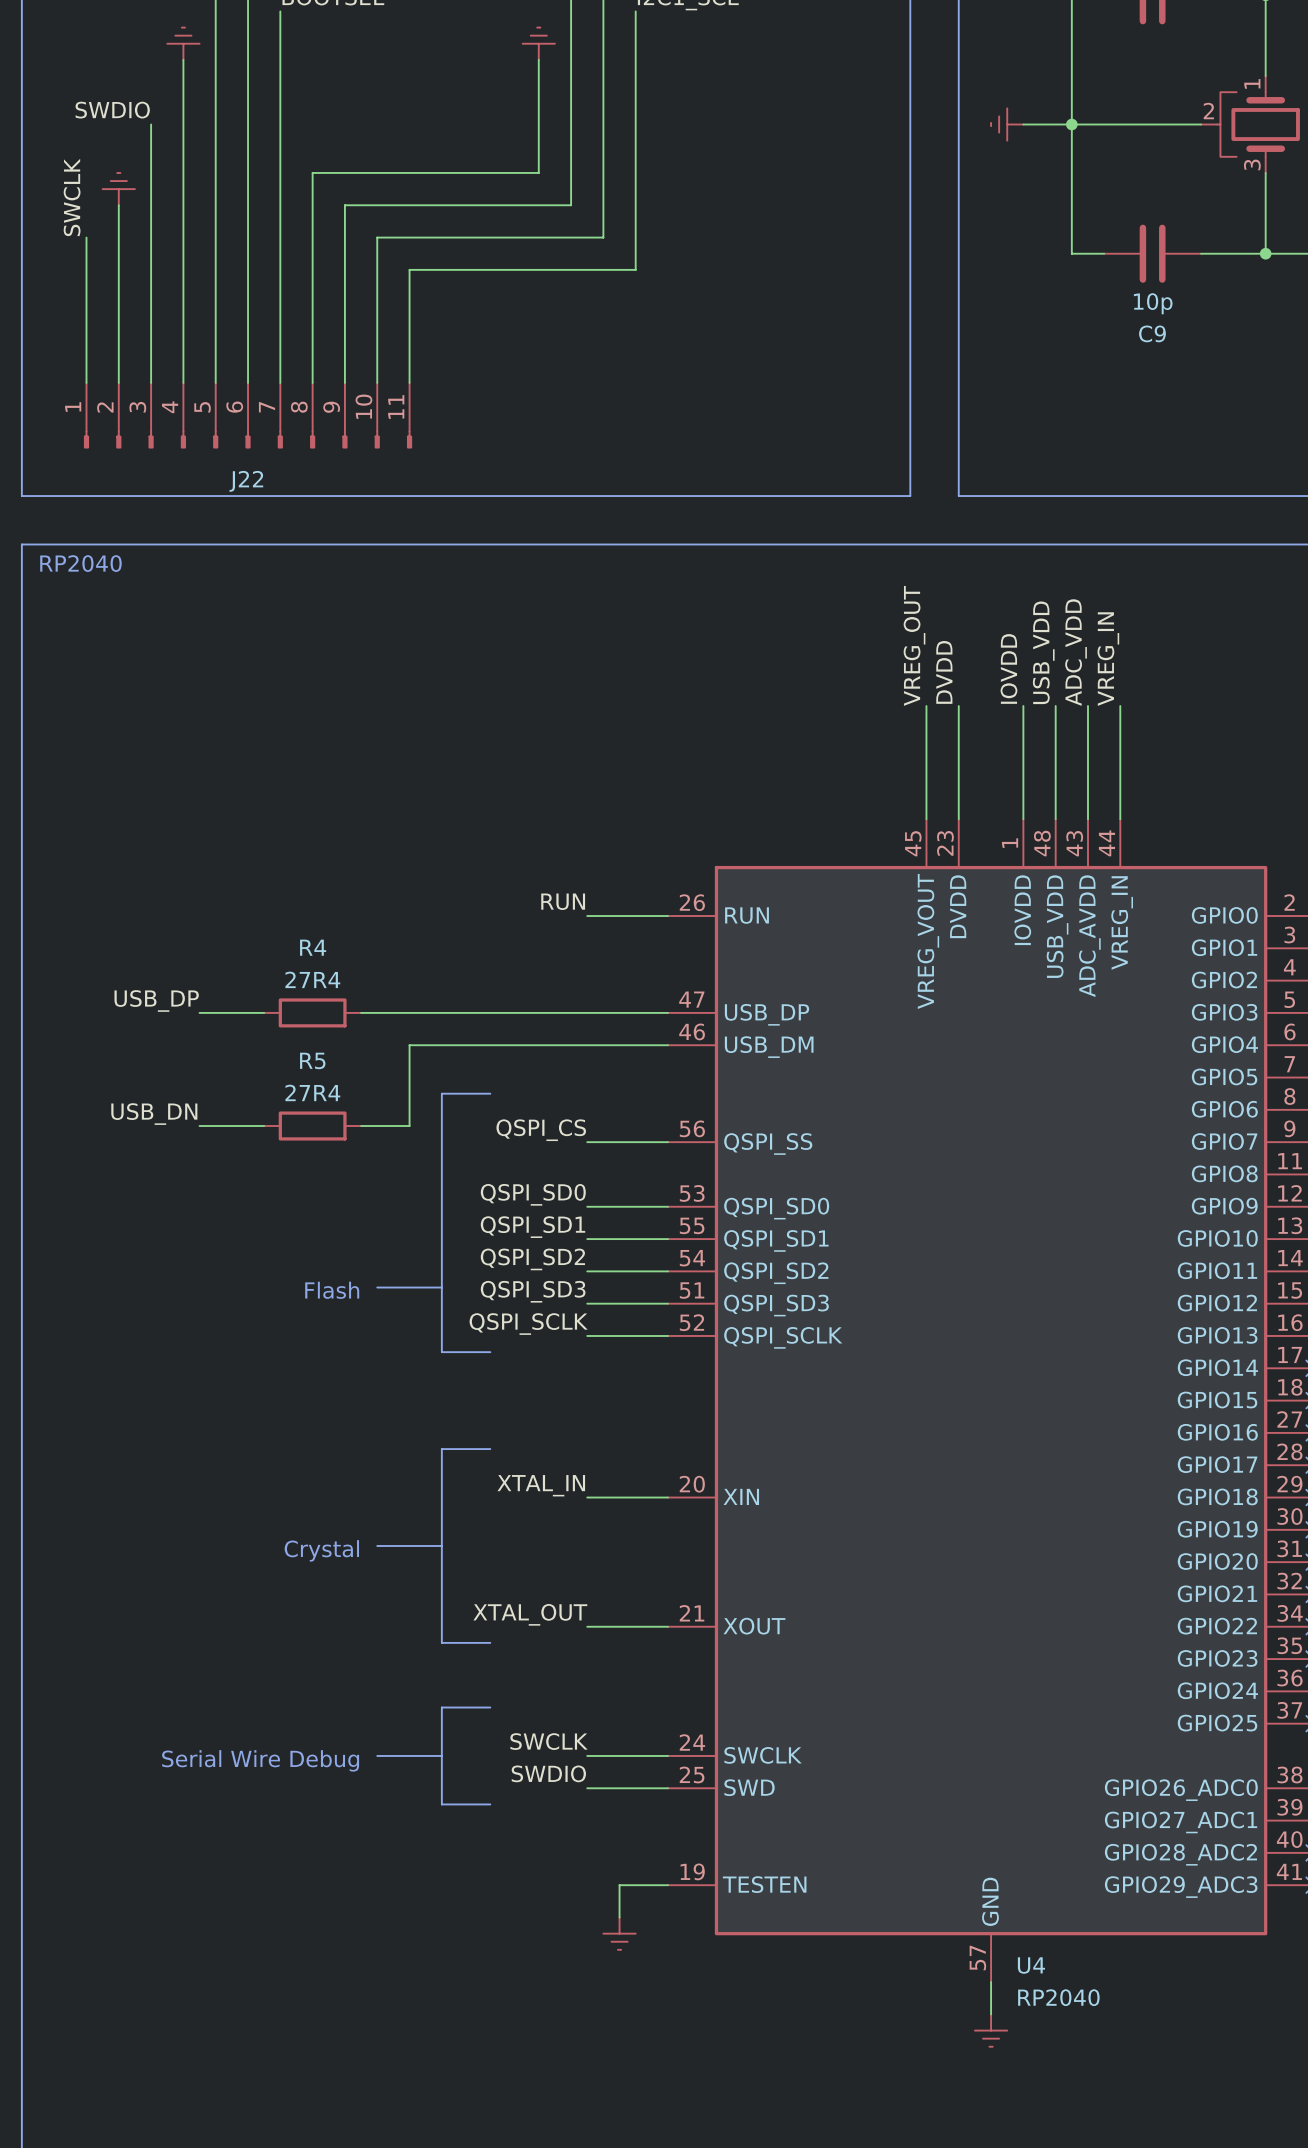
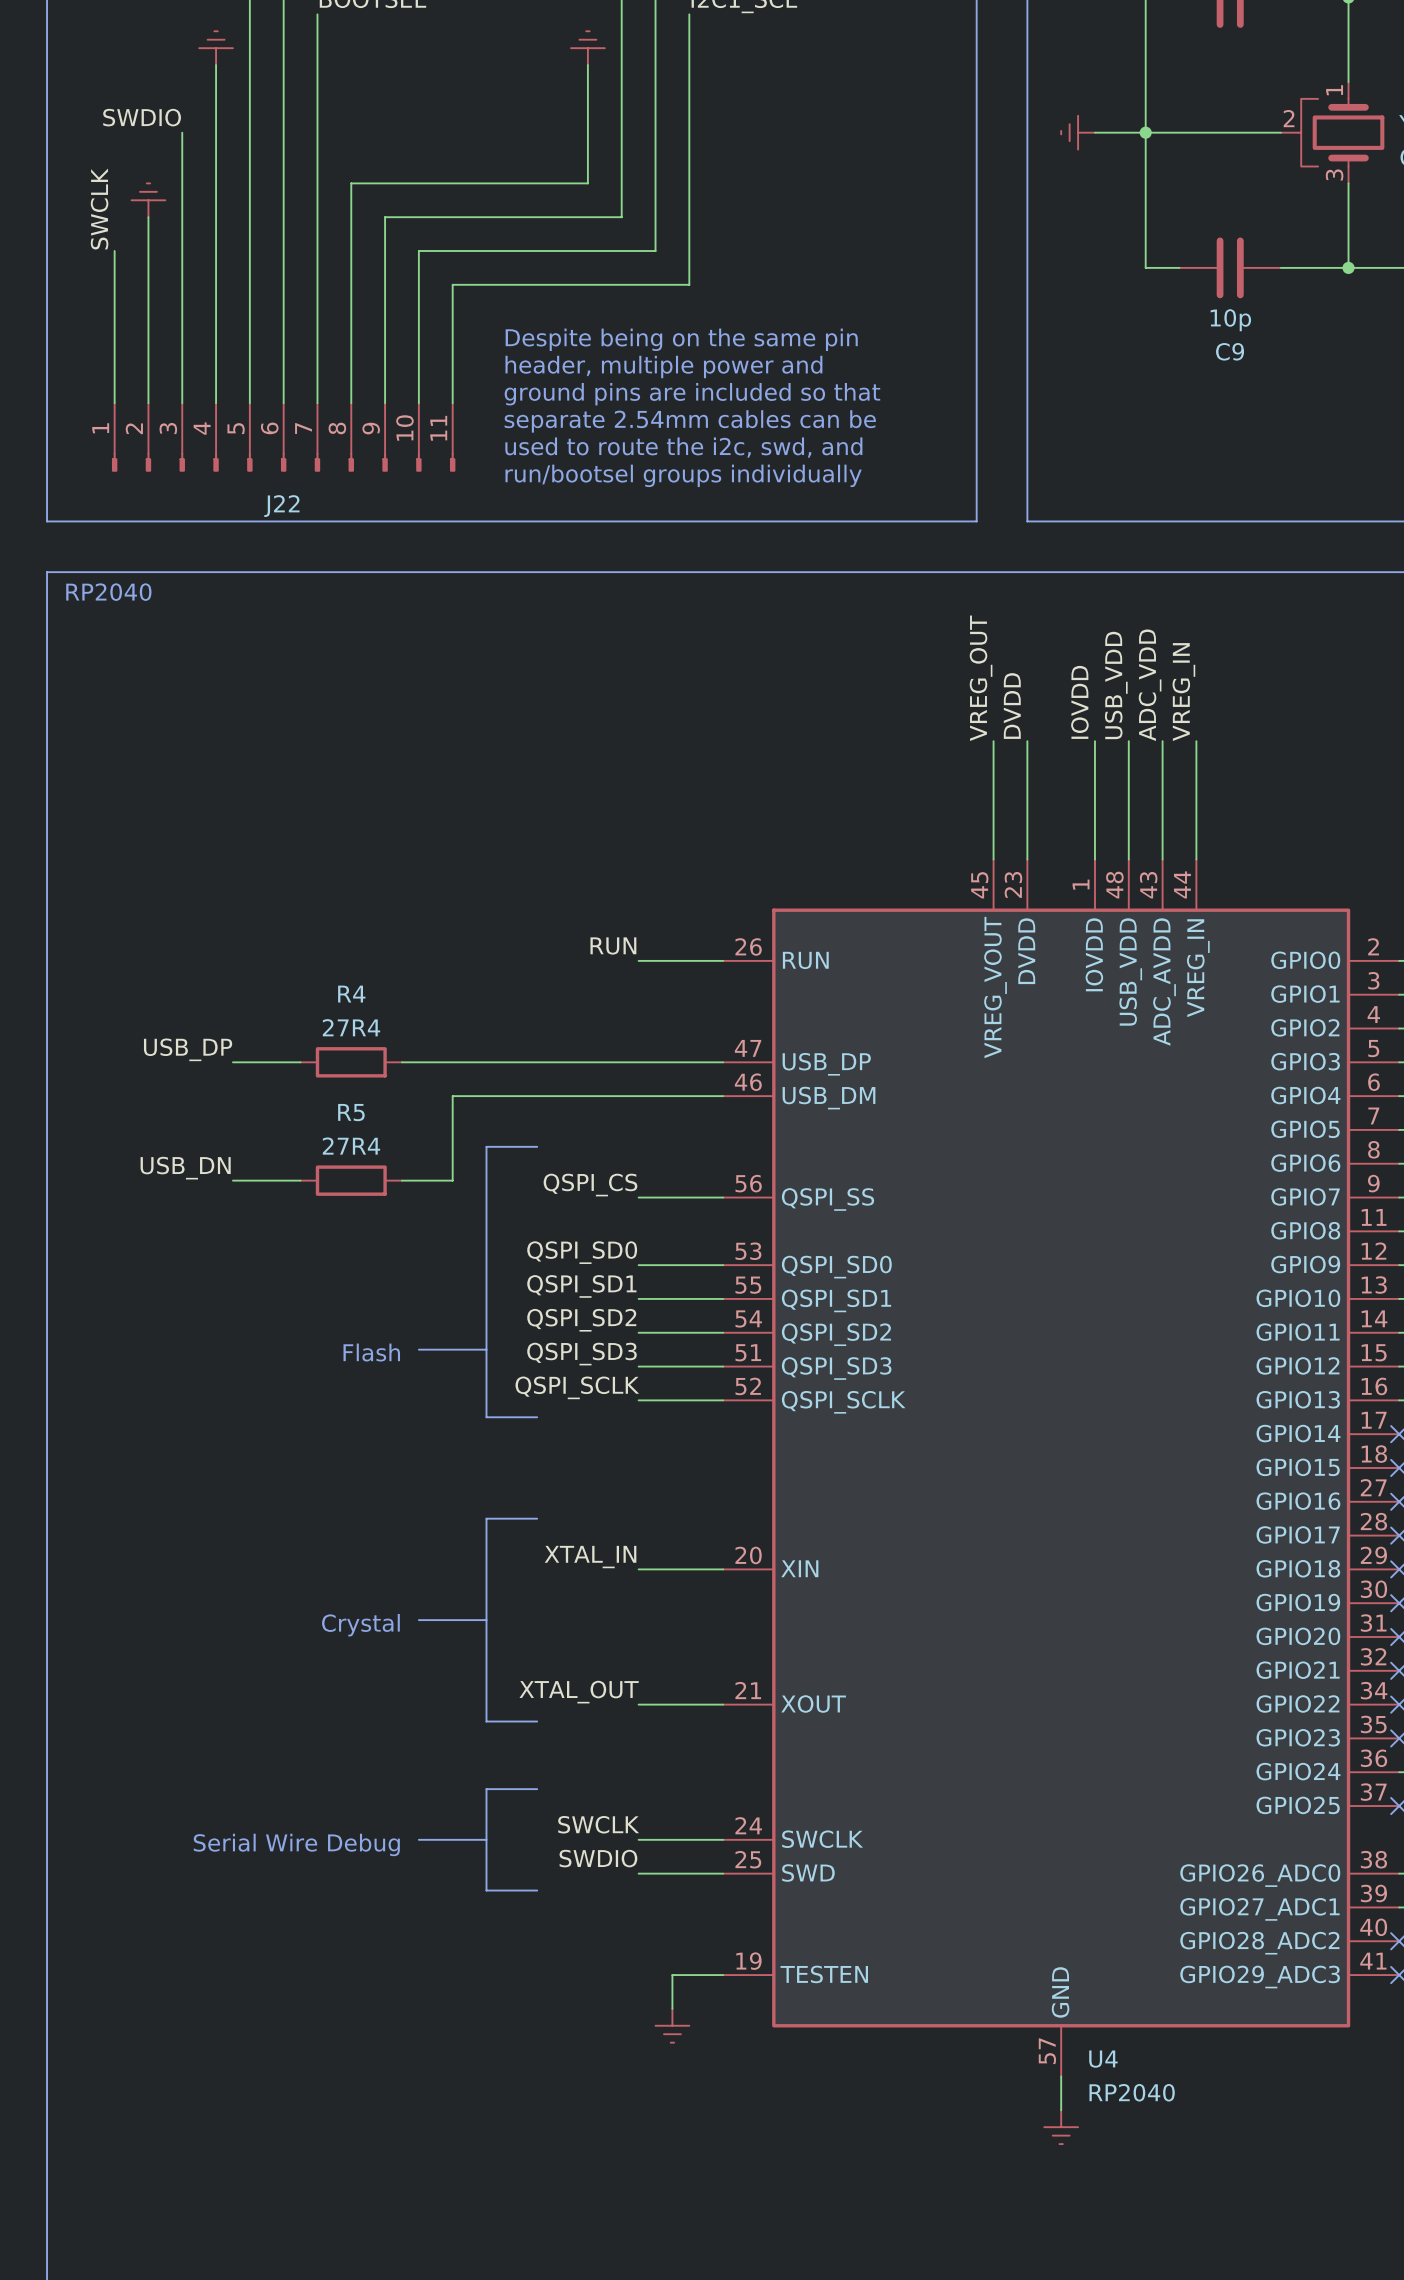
text: none -> Despite being on the same pin (681, 339)
text: none -> header, multiple power and (663, 366)
text: none -> ground pins are included so that (692, 394)
text: none -> separate 2.54mm cables can be (690, 421)
text: none -> used to route the i2c, swd, and (683, 447)
text: none -> run/bootsel groups individually (683, 475)

